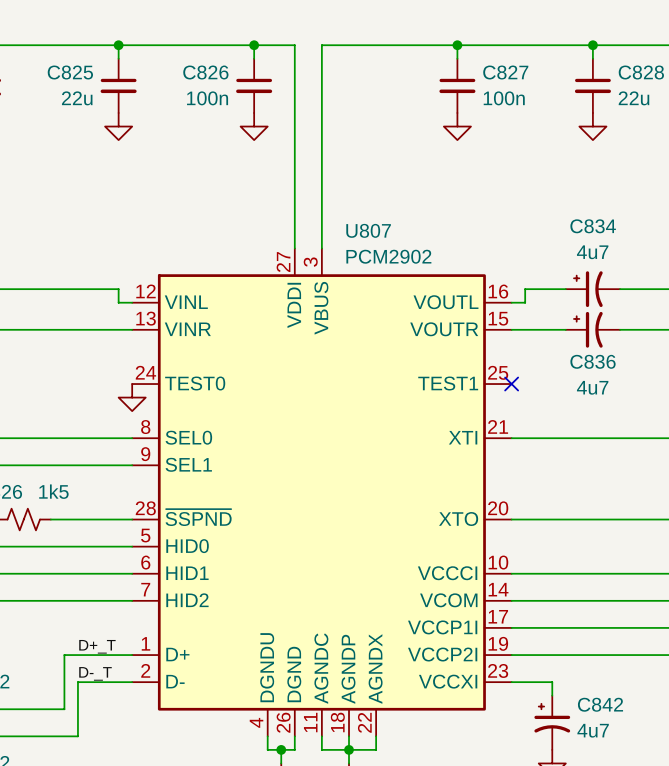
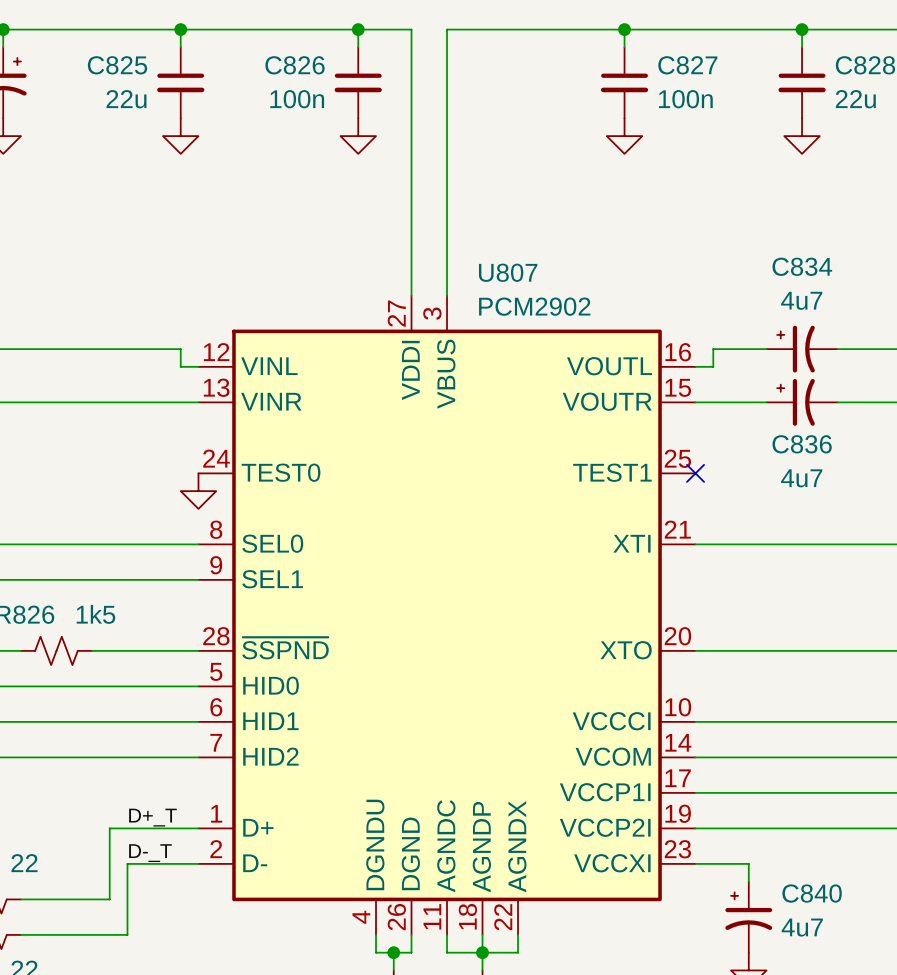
C842 name: C842 (600, 704) -> C840 (812, 893)

